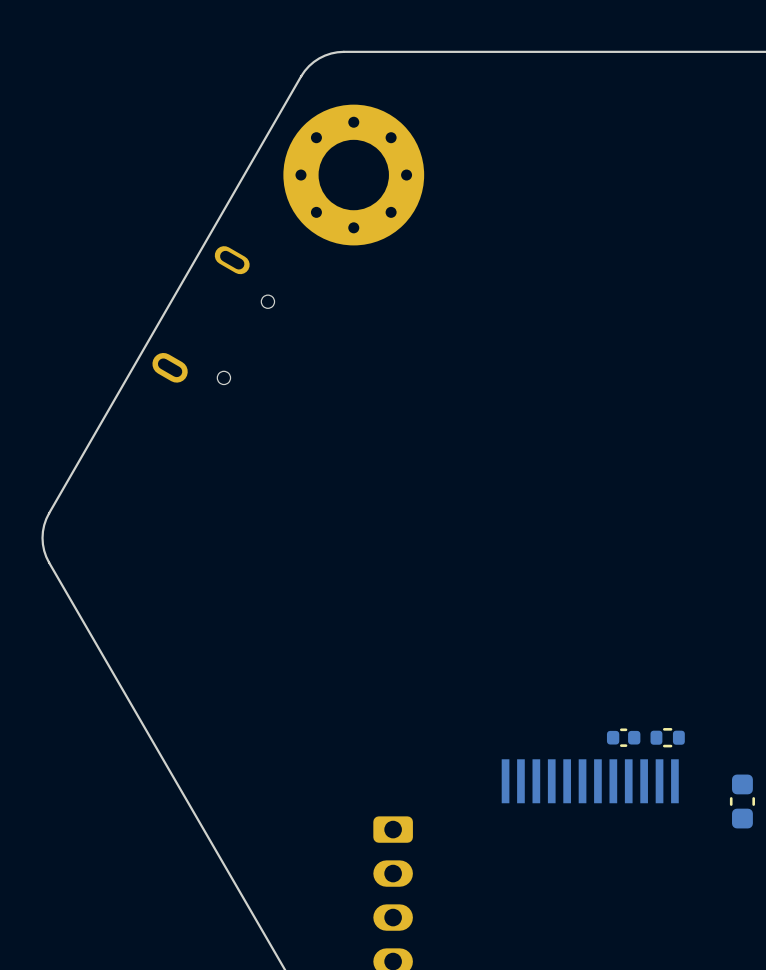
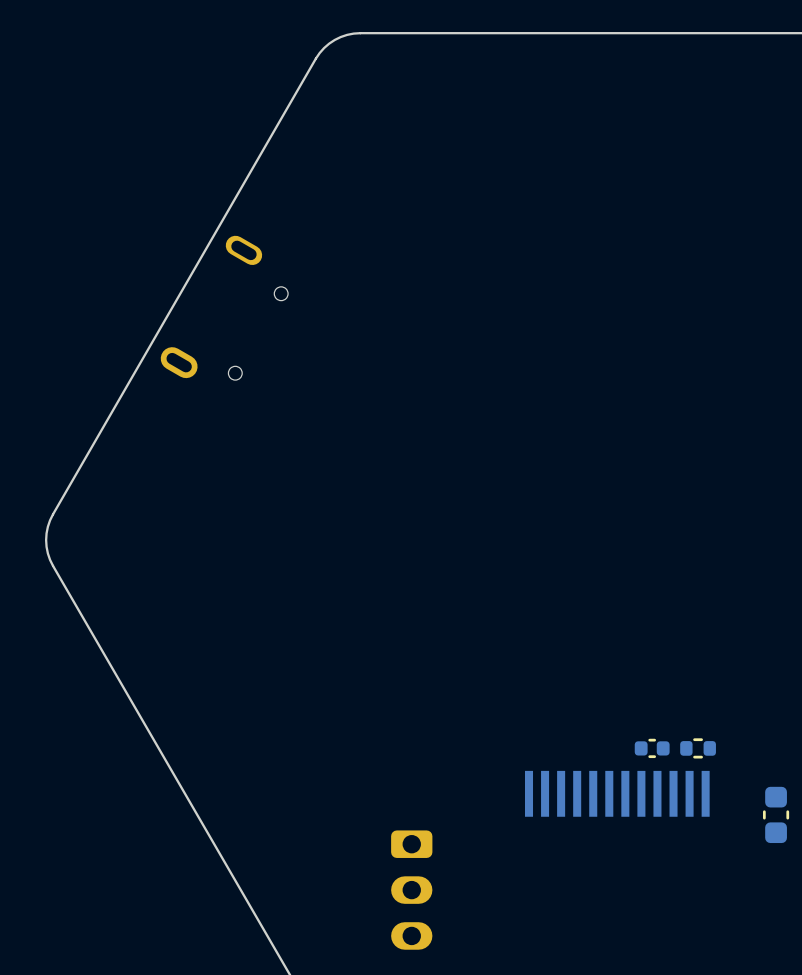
part: (353, 175) -> none

